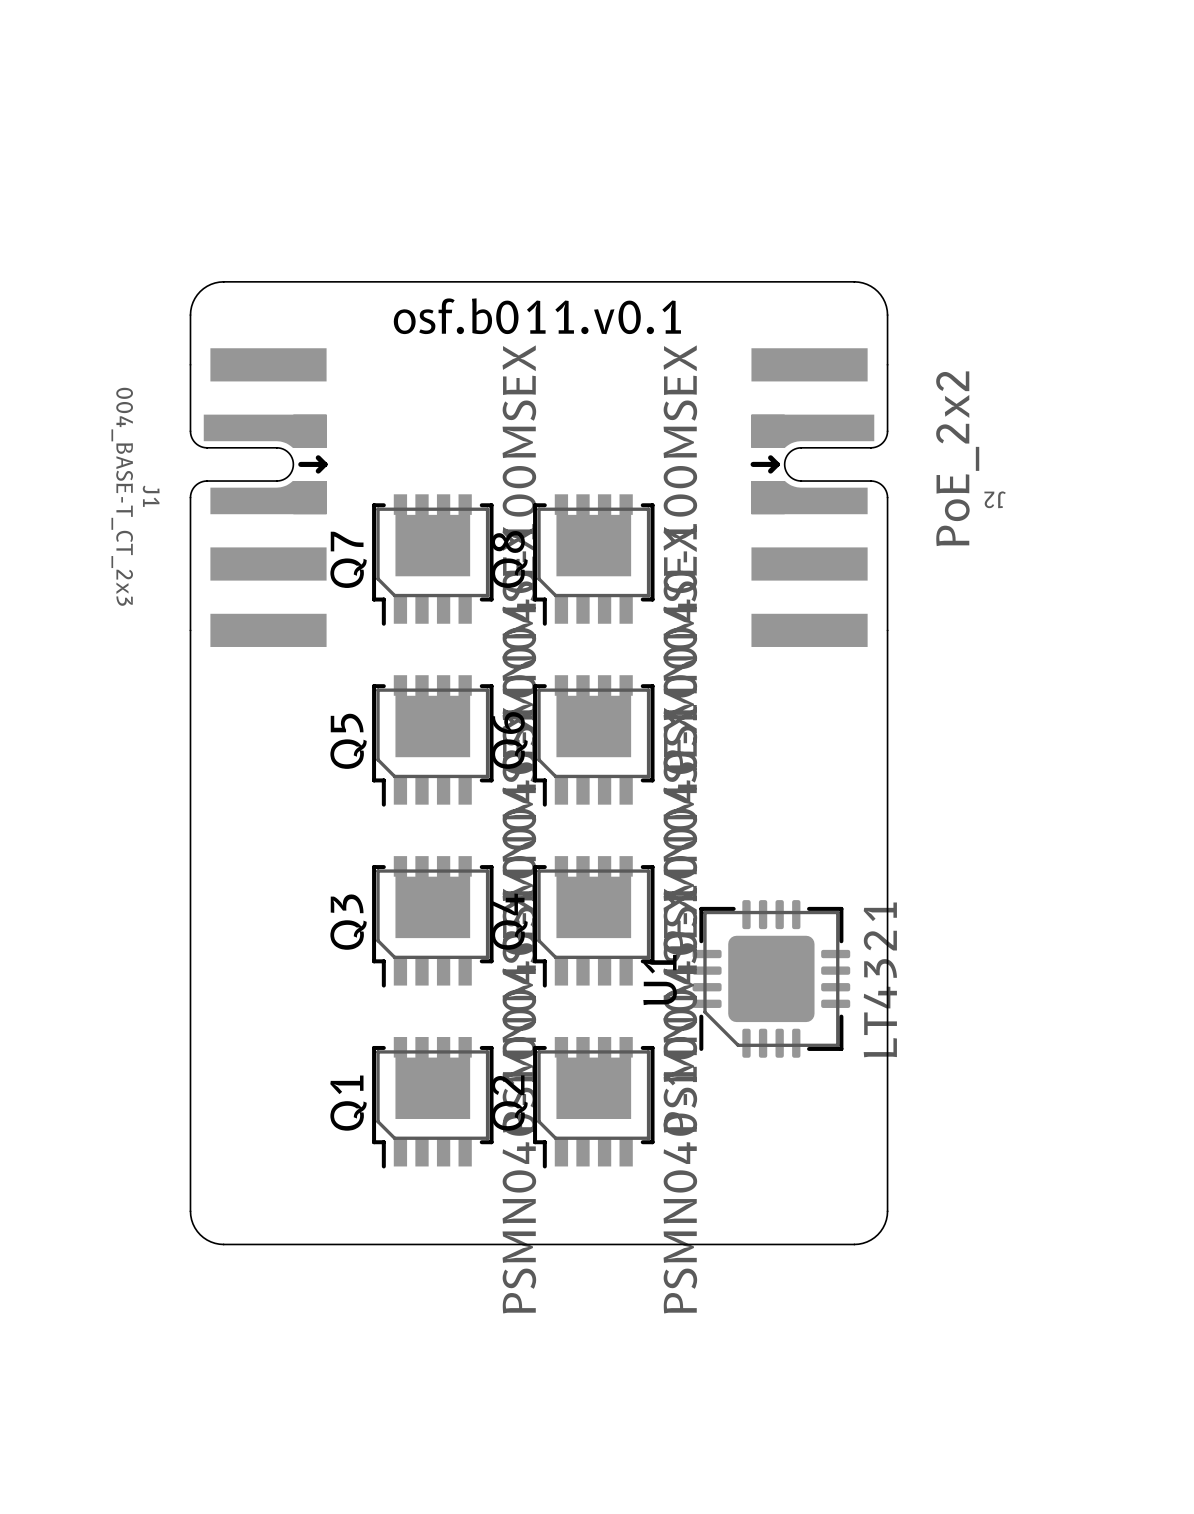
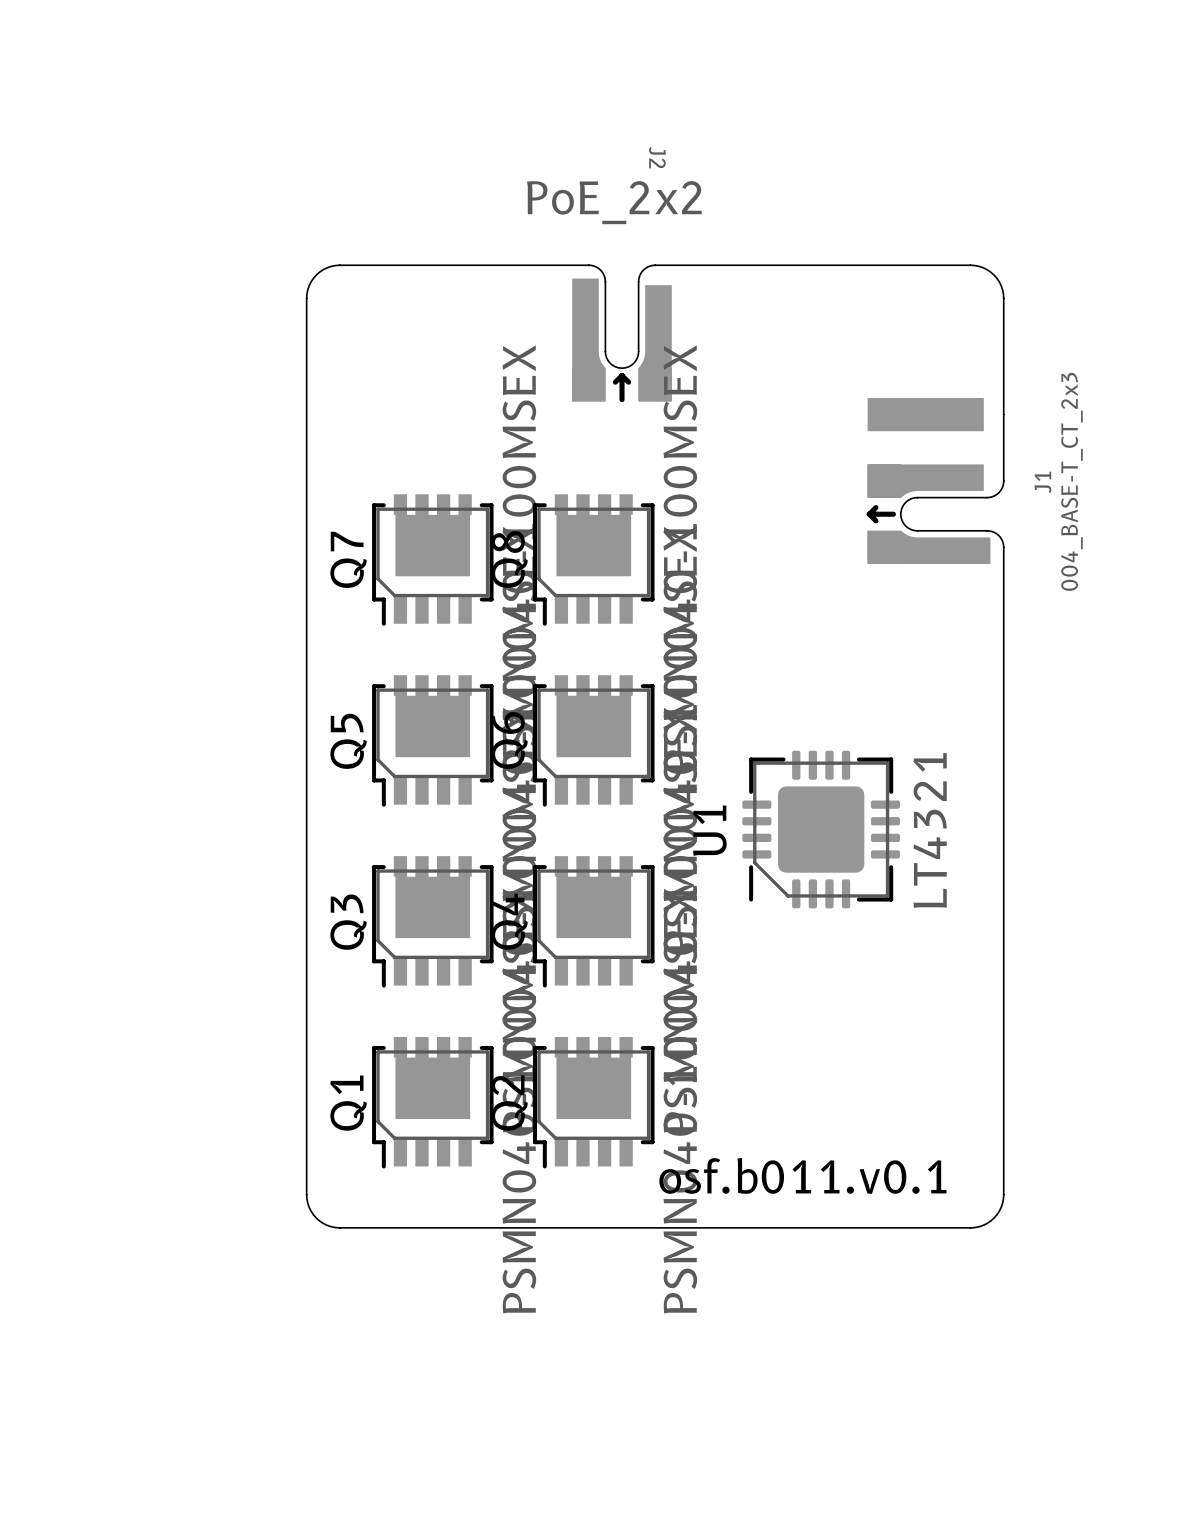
board edge: none -> (588, 265) (335, 265) (327, 267) (316, 274) (307, 289) (306, 1194) (309, 1207) (319, 1221) (327, 1225) (339, 1227) (970, 1227) (983, 1225) (994, 1218) (1001, 1207) (1003, 1194) (1003, 547)
board edge: none -> (655, 265) (970, 265) (983, 267) (996, 278) (1003, 294) (1003, 414)
text: osf.b011.v0.1 (537, 316) -> none
J1 footprint: [189, 348, 328, 647] -> [866, 398, 1005, 565]
J2 footprint: [750, 348, 889, 647] -> [572, 264, 672, 403]
board edge: (190, 364) (190, 315) (193, 302) (203, 288) (210, 284) (223, 281) (858, 282) (874, 288) (885, 302) (887, 315) (887, 364) -> none
J2 value position: PoE_2x2 (957, 458) -> PoE_2x2 (614, 202)
J1 value position: 004_BASE-T_CT_2x3 (122, 496) -> 004_BASE-T_CT_2x3 (1071, 481)
J1 name position: J1 (151, 496) -> J1 (1043, 482)
J2 name position: J2 (995, 499) -> J2 (657, 157)
board edge: (190, 630) (190, 1211) (193, 1223) (200, 1234) (210, 1241) (223, 1244) (854, 1244) (867, 1241) (877, 1234) (885, 1223) (887, 1211) (887, 630) -> none
U1 position: (771, 978) -> (821, 829)
text: none -> osf.b011.v0.1 (802, 1175)

